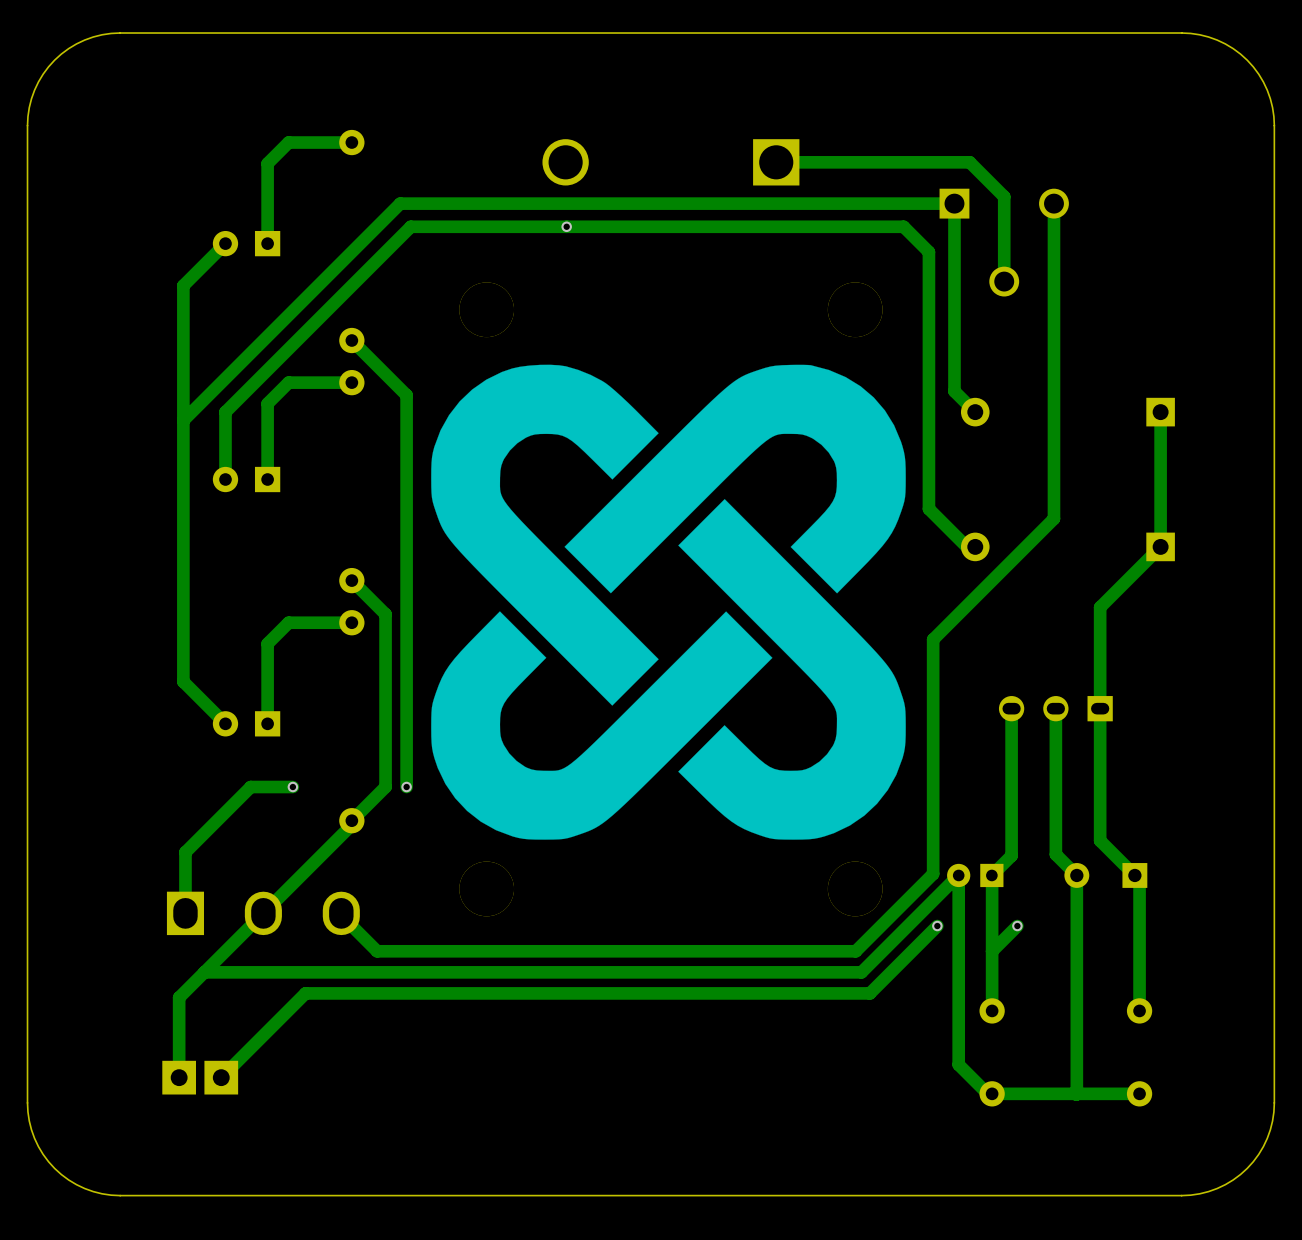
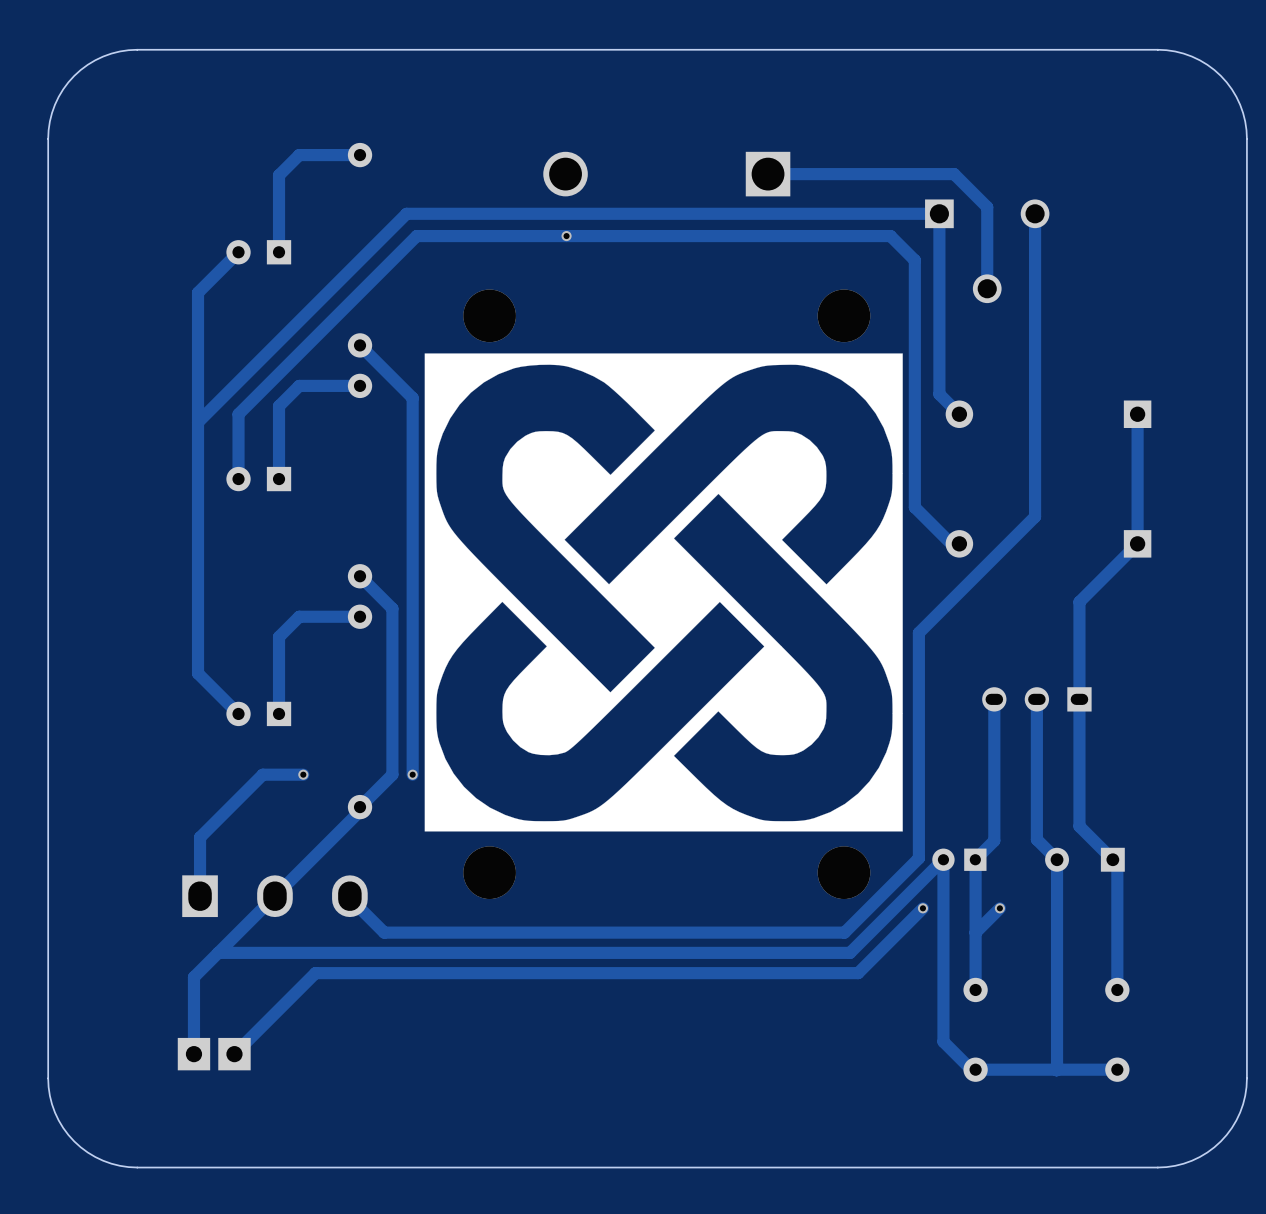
drawing shape: [431, 364, 906, 840] -> [424, 353, 903, 832]

